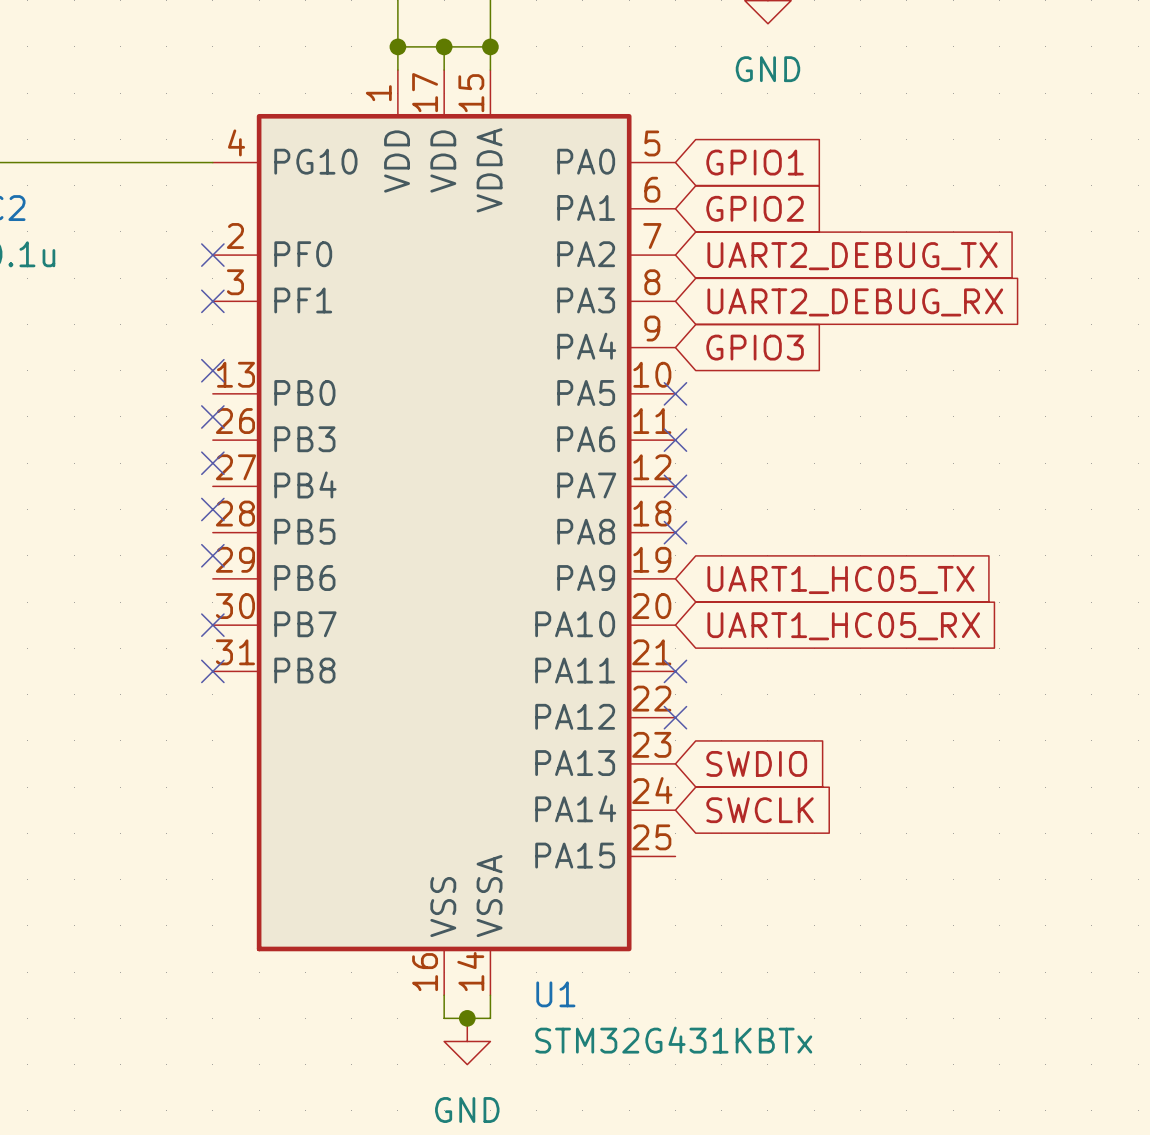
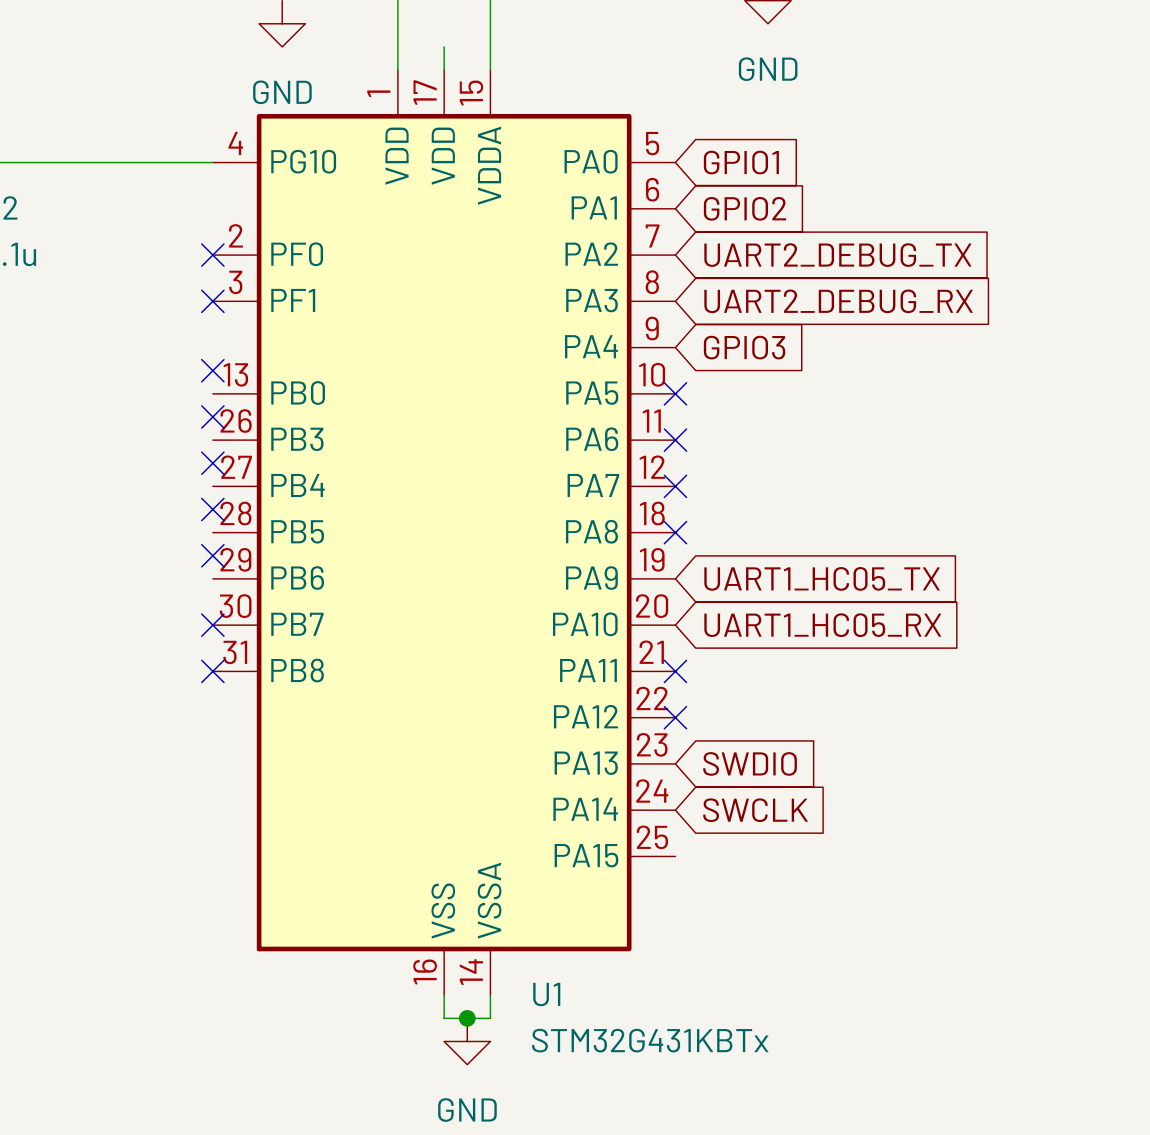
power symbol: none -> GND (282, 23)
wire: (397, 46) (490, 46) -> none
junction: (397, 46) -> none
junction: (444, 46) -> none
junction: (490, 46) -> none

